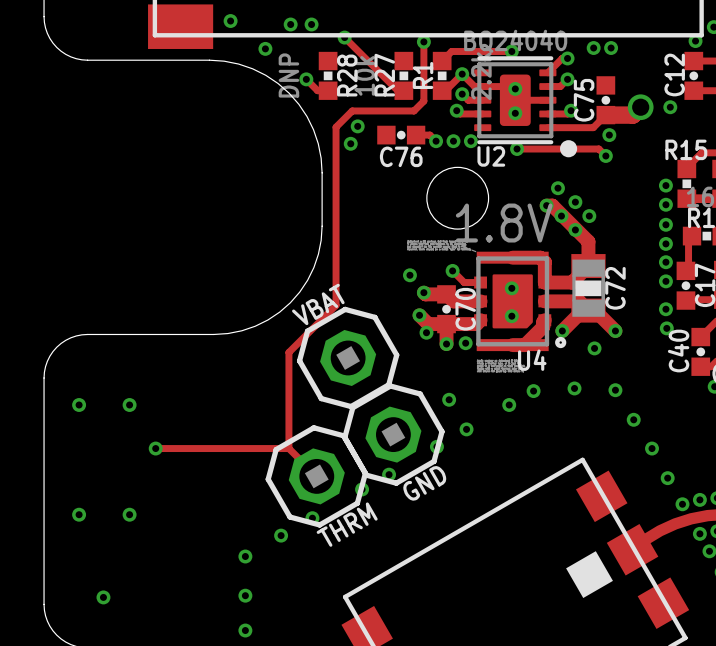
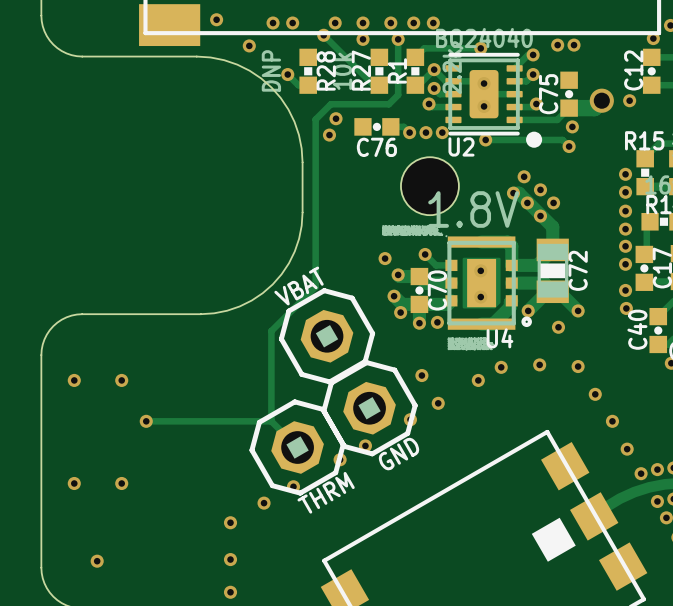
via: none -> (335, 23)
via: none -> (363, 23)
via: none -> (390, 23)
via: none -> (413, 23)
via: none -> (433, 23)
via: none -> (363, 39)

